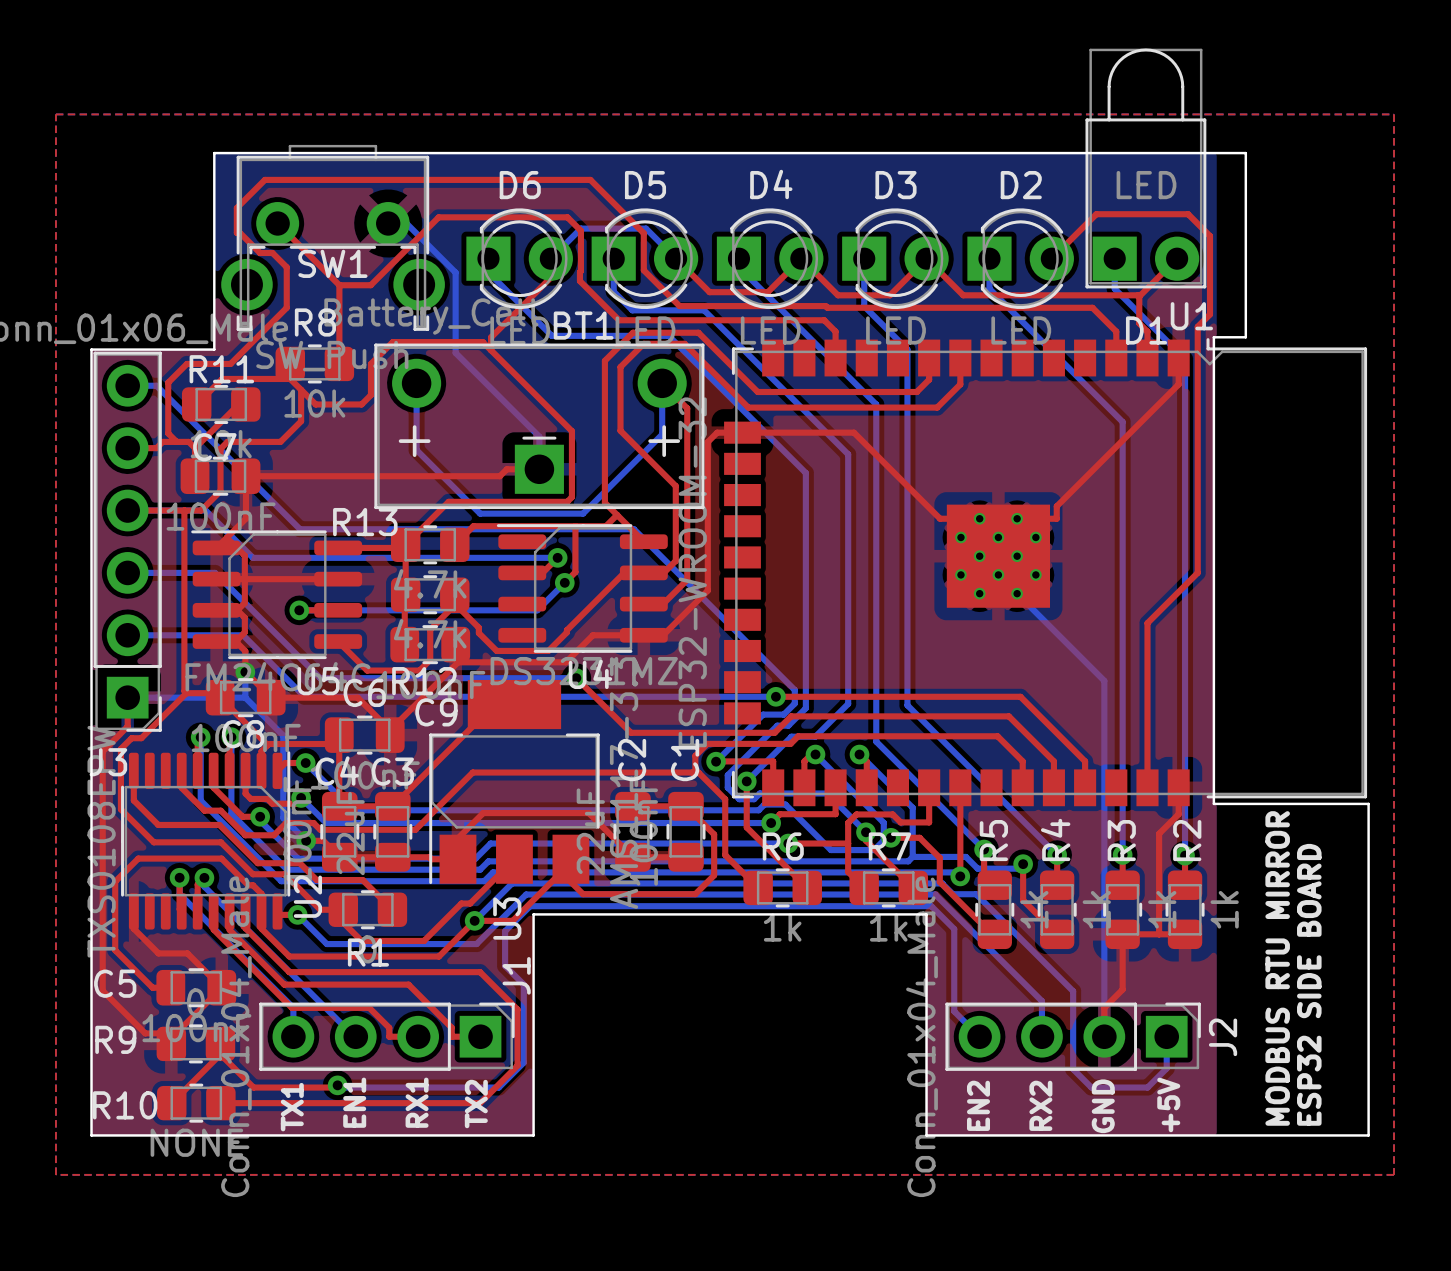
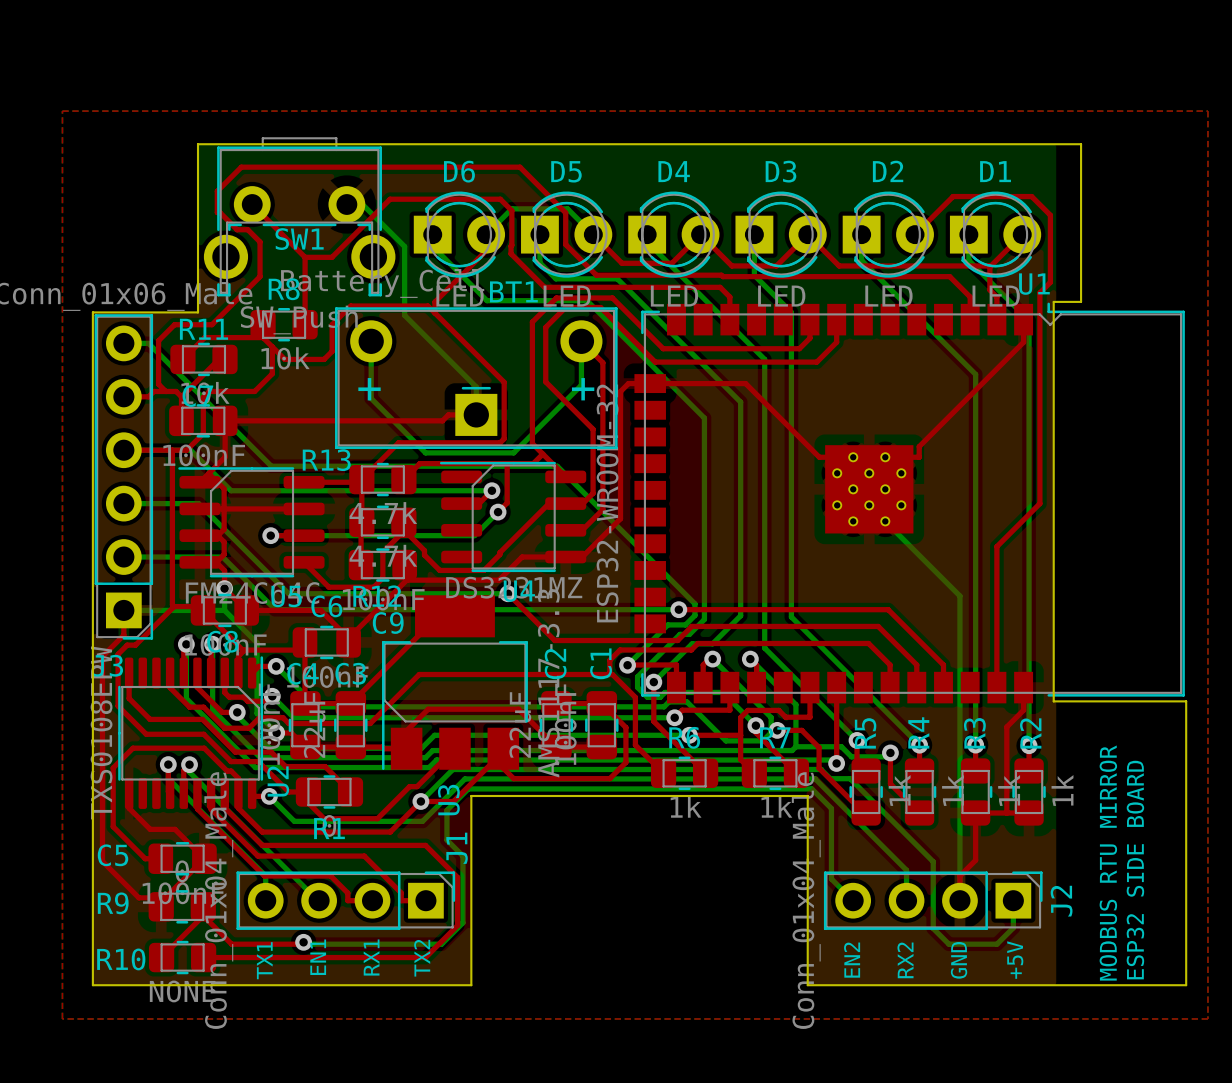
D1 footprint: [1085, 48, 1207, 289] -> [949, 191, 1042, 278]
D1 value position: LED (1146, 185) -> LED (996, 296)
D1 name position: D1 (1146, 330) -> D1 (995, 171)

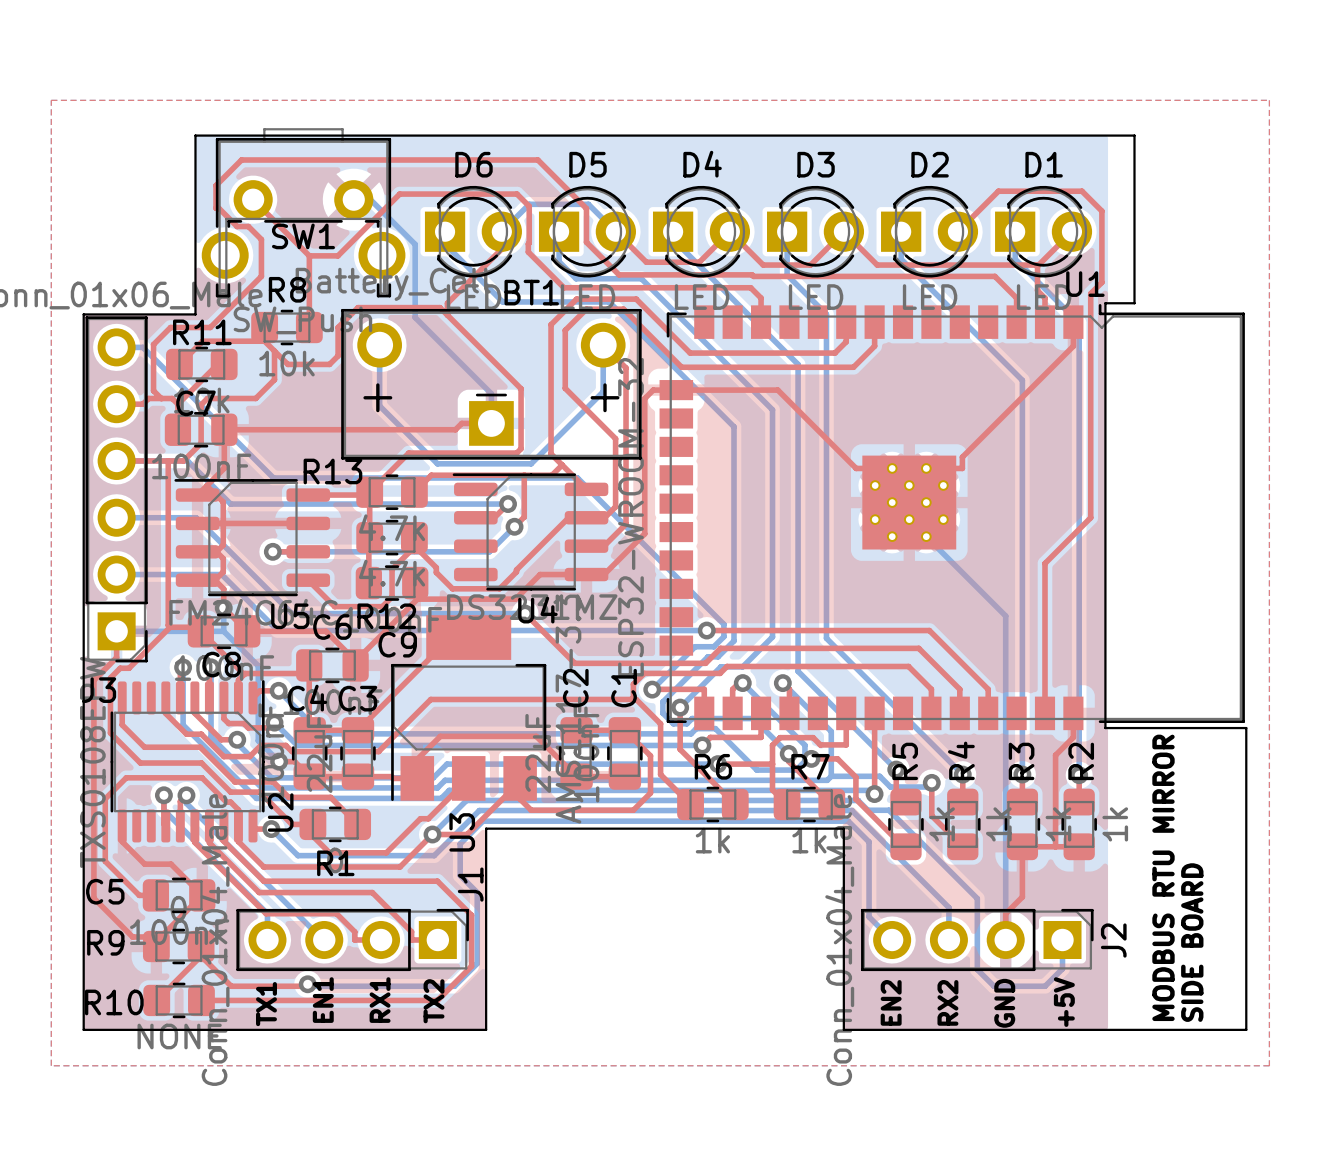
text: ESP32 SIDE BOARD (1135, 870) -> SIDE BOARD (1192, 942)

